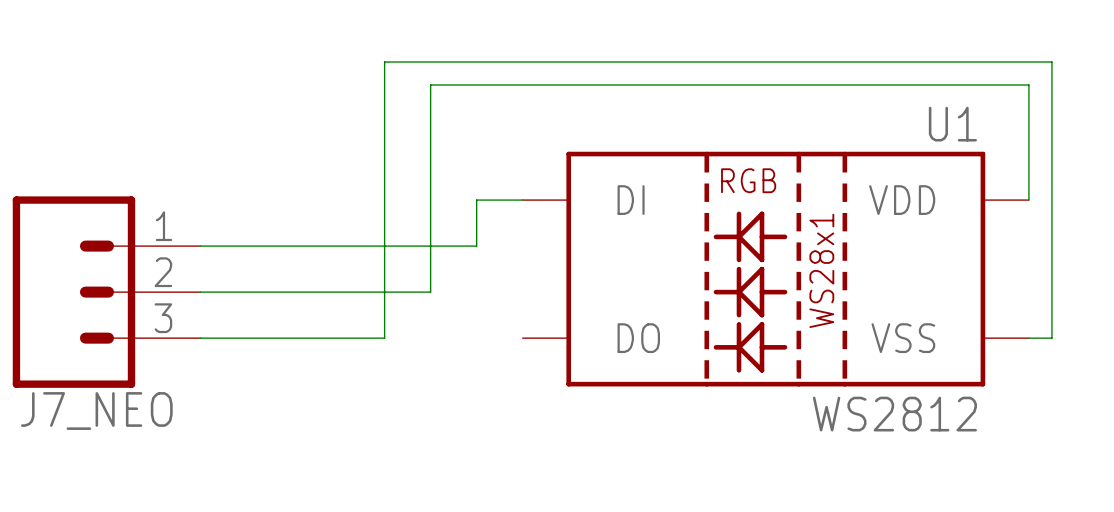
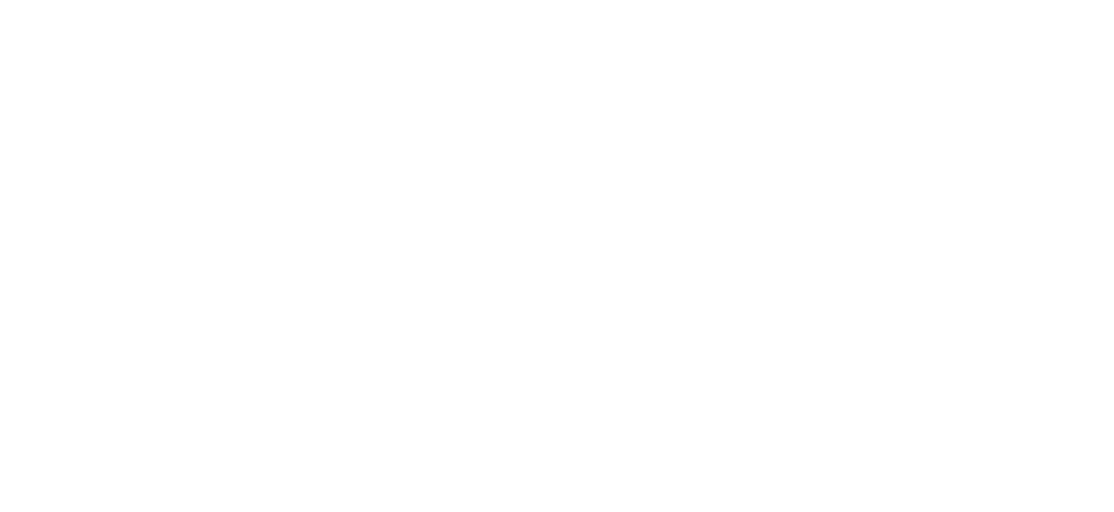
wire: (522, 200) (476, 200) (476, 246) (200, 246) -> none
wire: (1028, 200) (1028, 85) (430, 85) (430, 292) (200, 292) -> none
U1: WS2812 (775, 269) -> none
J7_NEO: (106, 292) -> none
wire: (200, 338) (384, 338) (384, 62) (1051, 62) (1051, 338) (1028, 338) -> none

